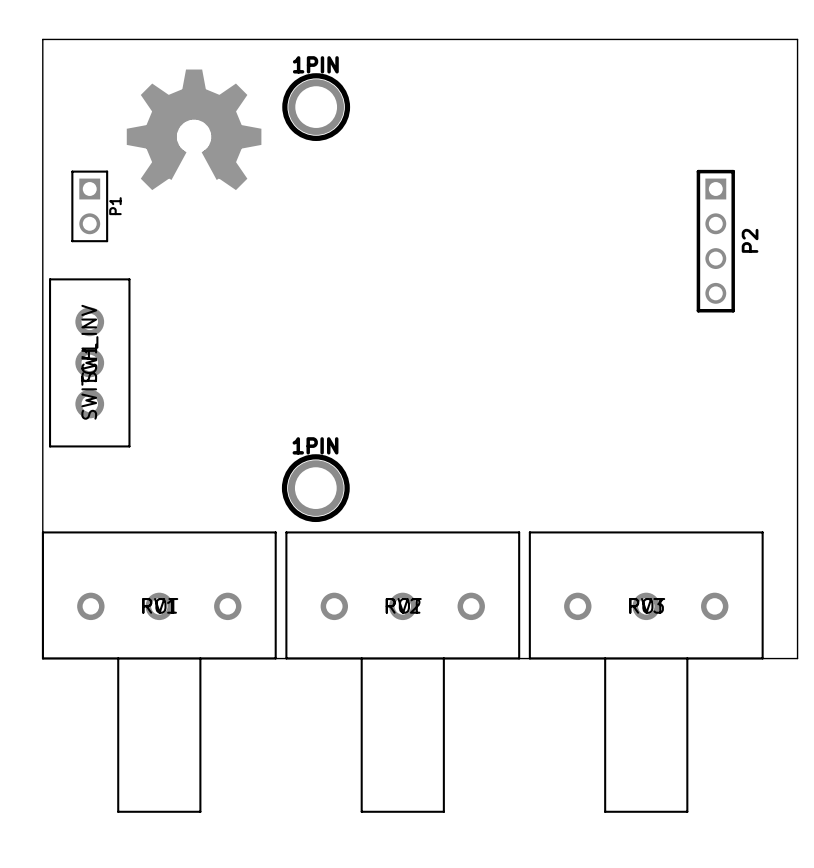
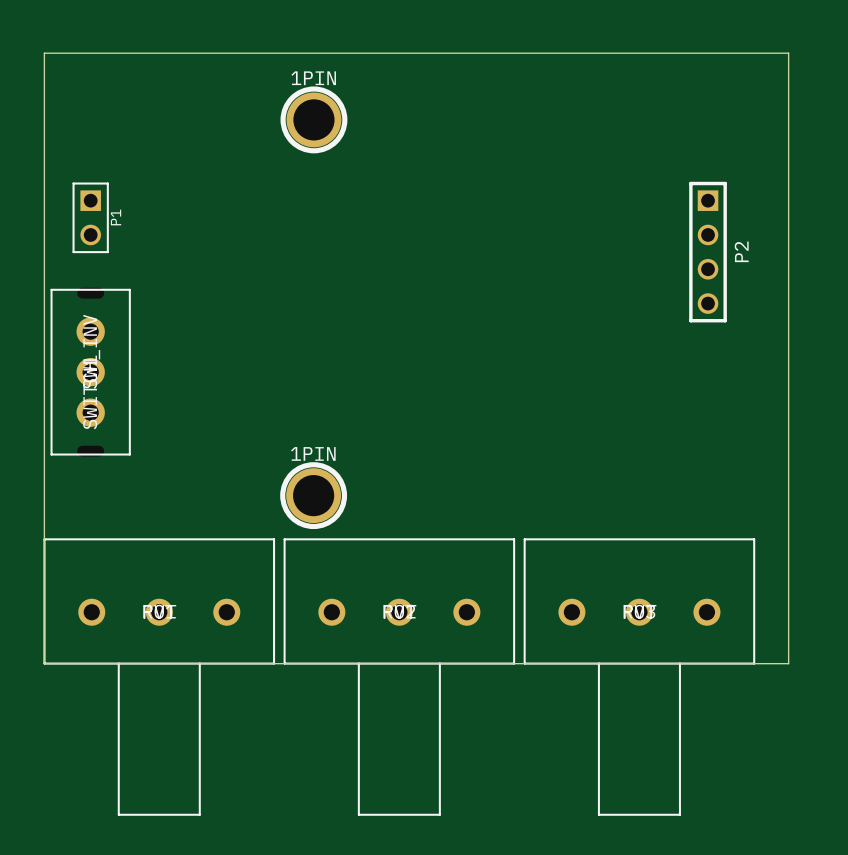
part: (194, 129) -> none

